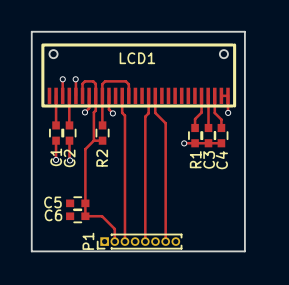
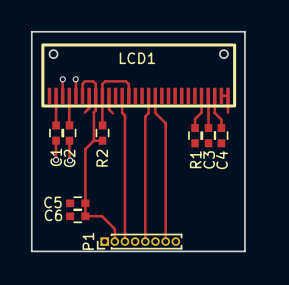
via: (84, 112) -> none
via: (228, 112) -> none
via: (112, 113) -> none
track: (184, 143) (221, 143) -> none
via: (184, 143) -> none

